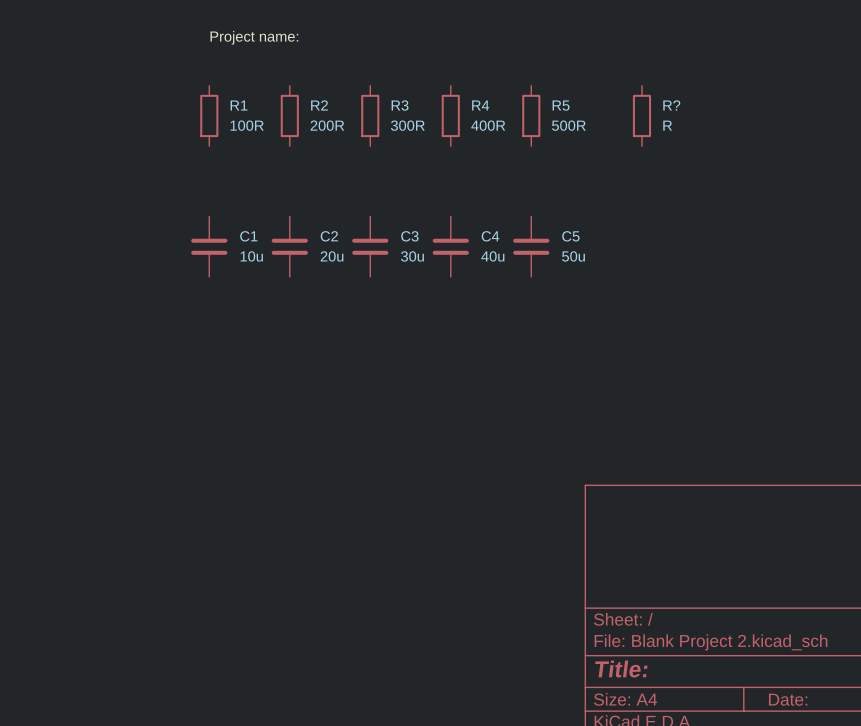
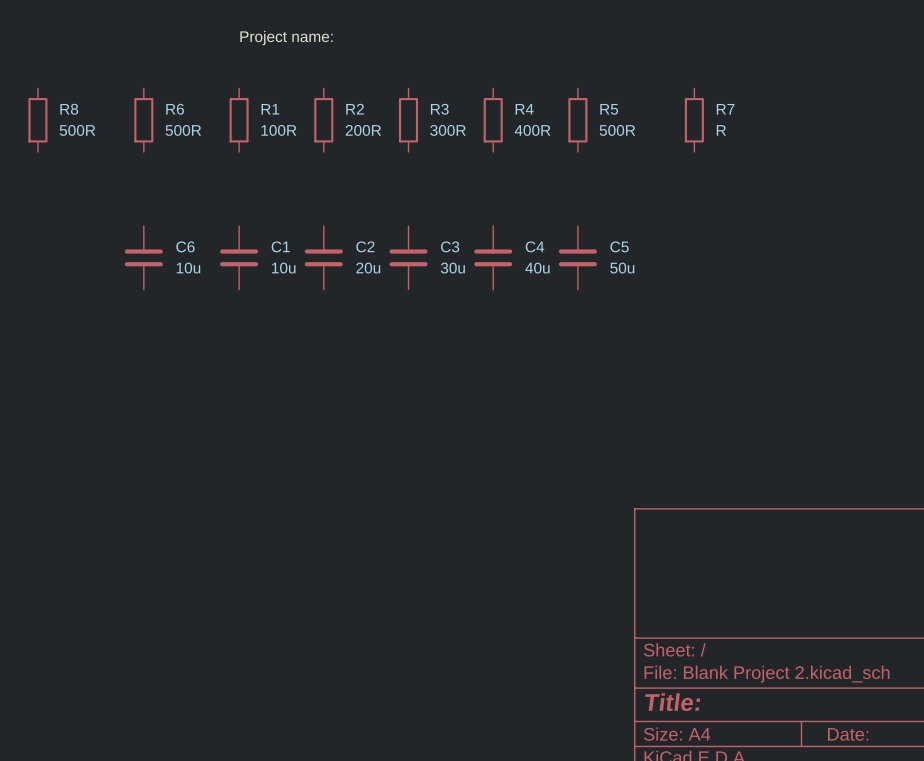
R? name: R? (671, 105) -> R7 (725, 109)
R8: none -> 500R (37, 120)
R6: none -> 500R (143, 120)
C6: none -> 10u (143, 257)

